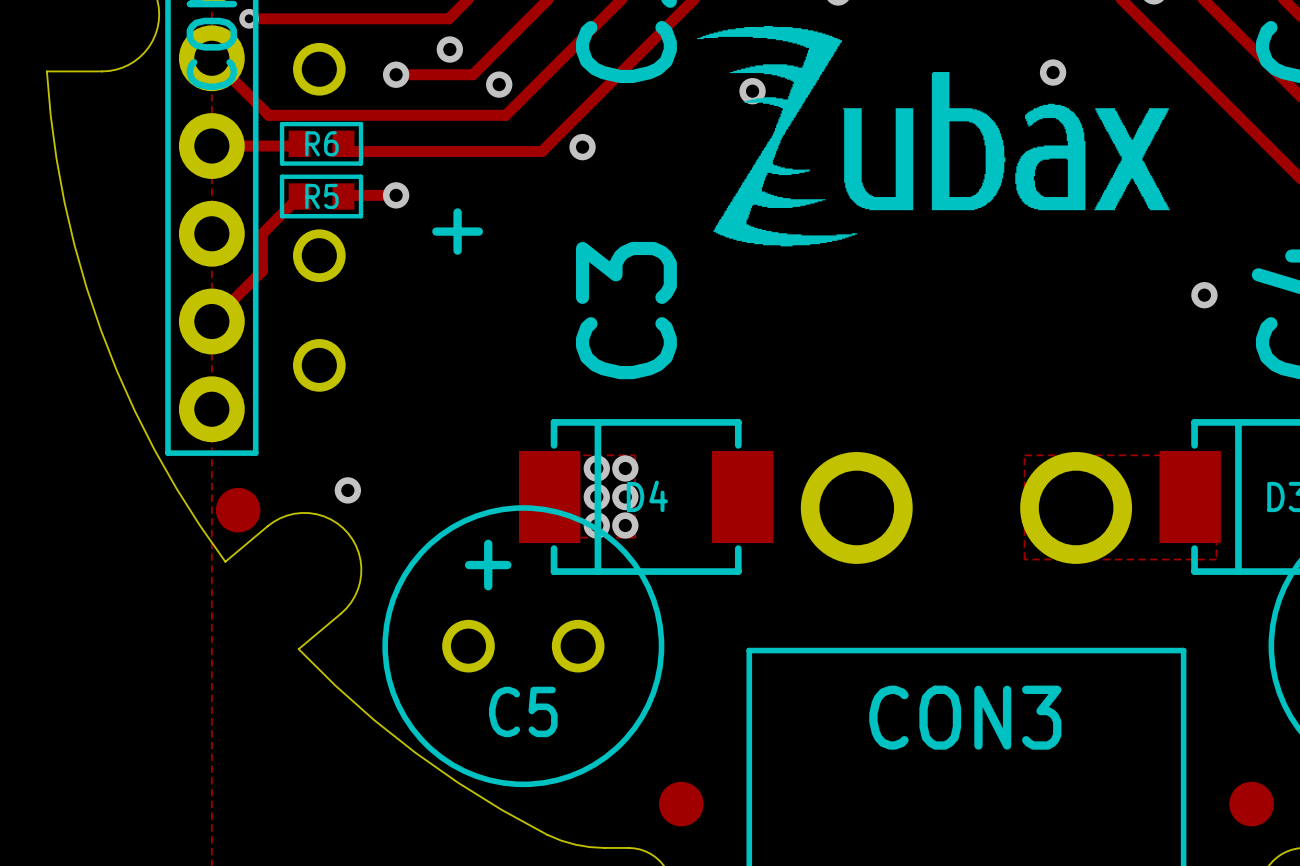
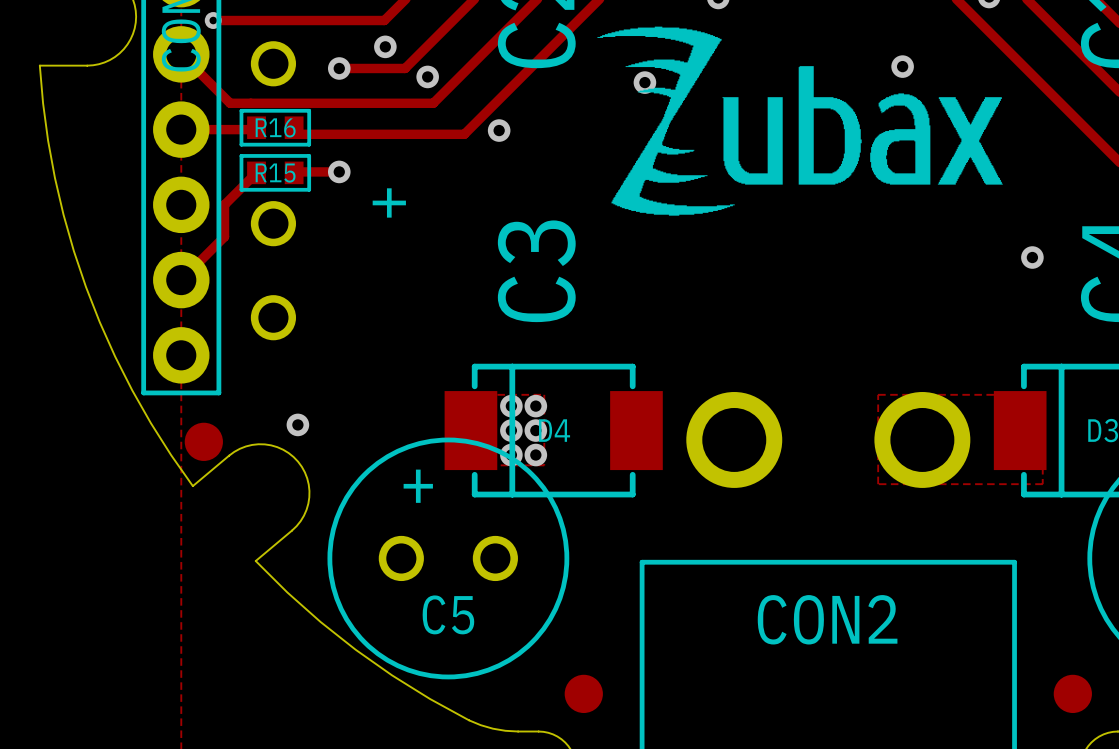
R6 name: R6 (322, 143) -> R16 (275, 127)
R5 name: R5 (322, 196) -> R15 (275, 173)
CON3 name: CON3 (965, 717) -> CON2 (827, 619)

